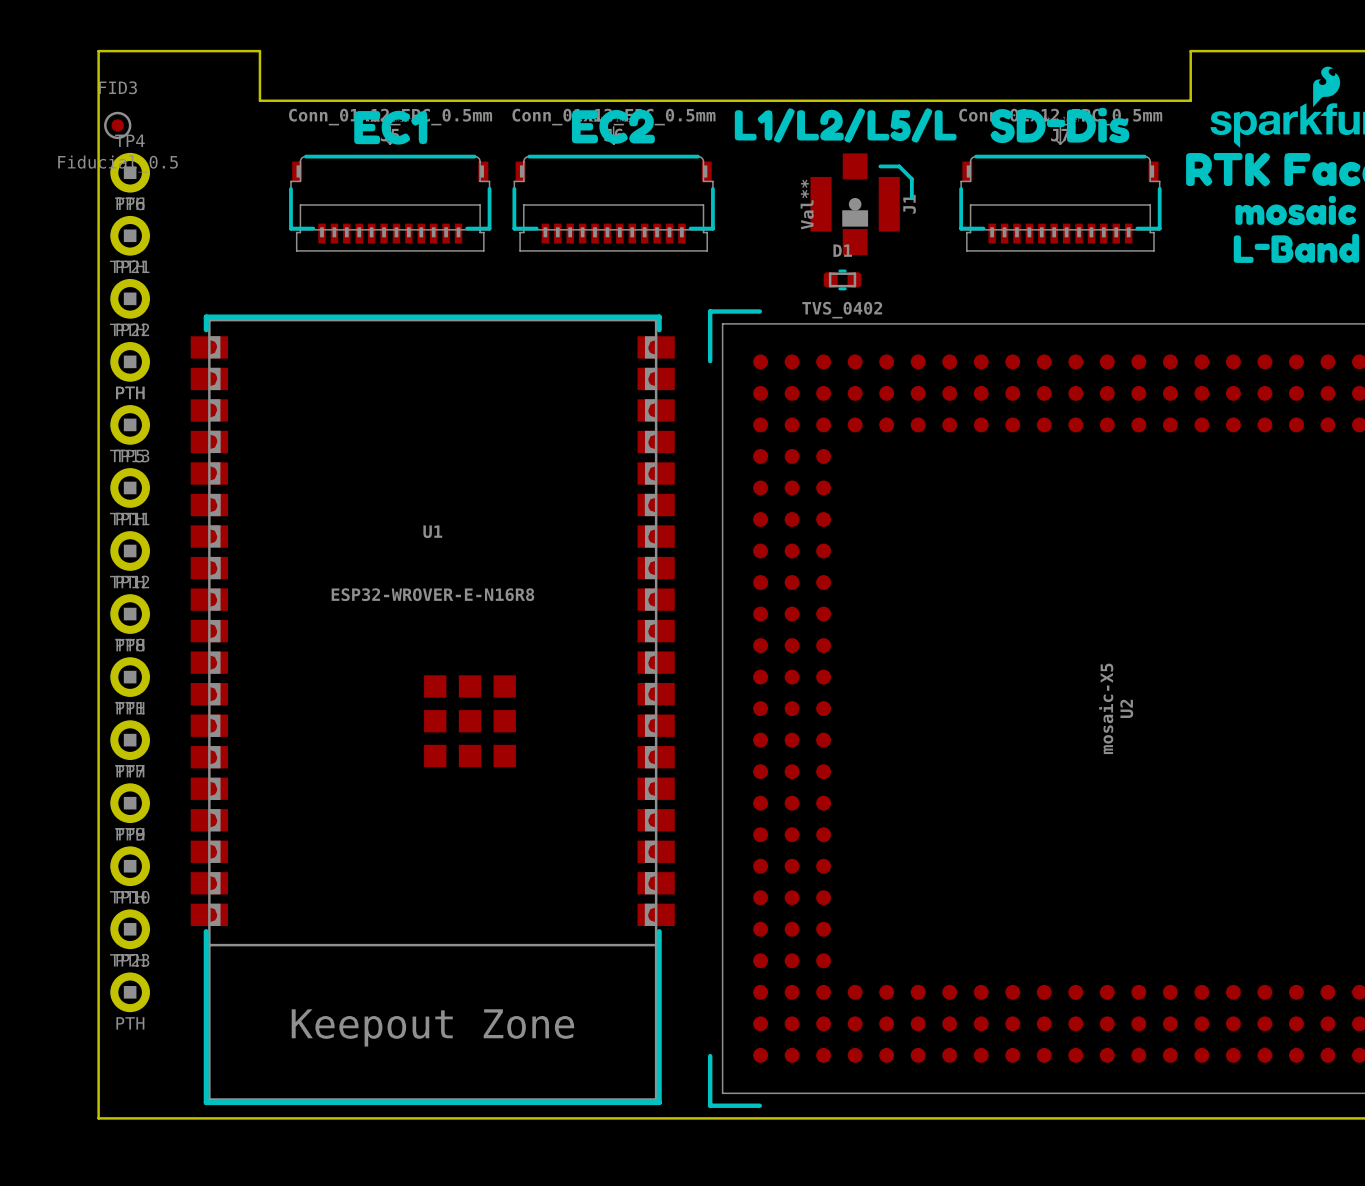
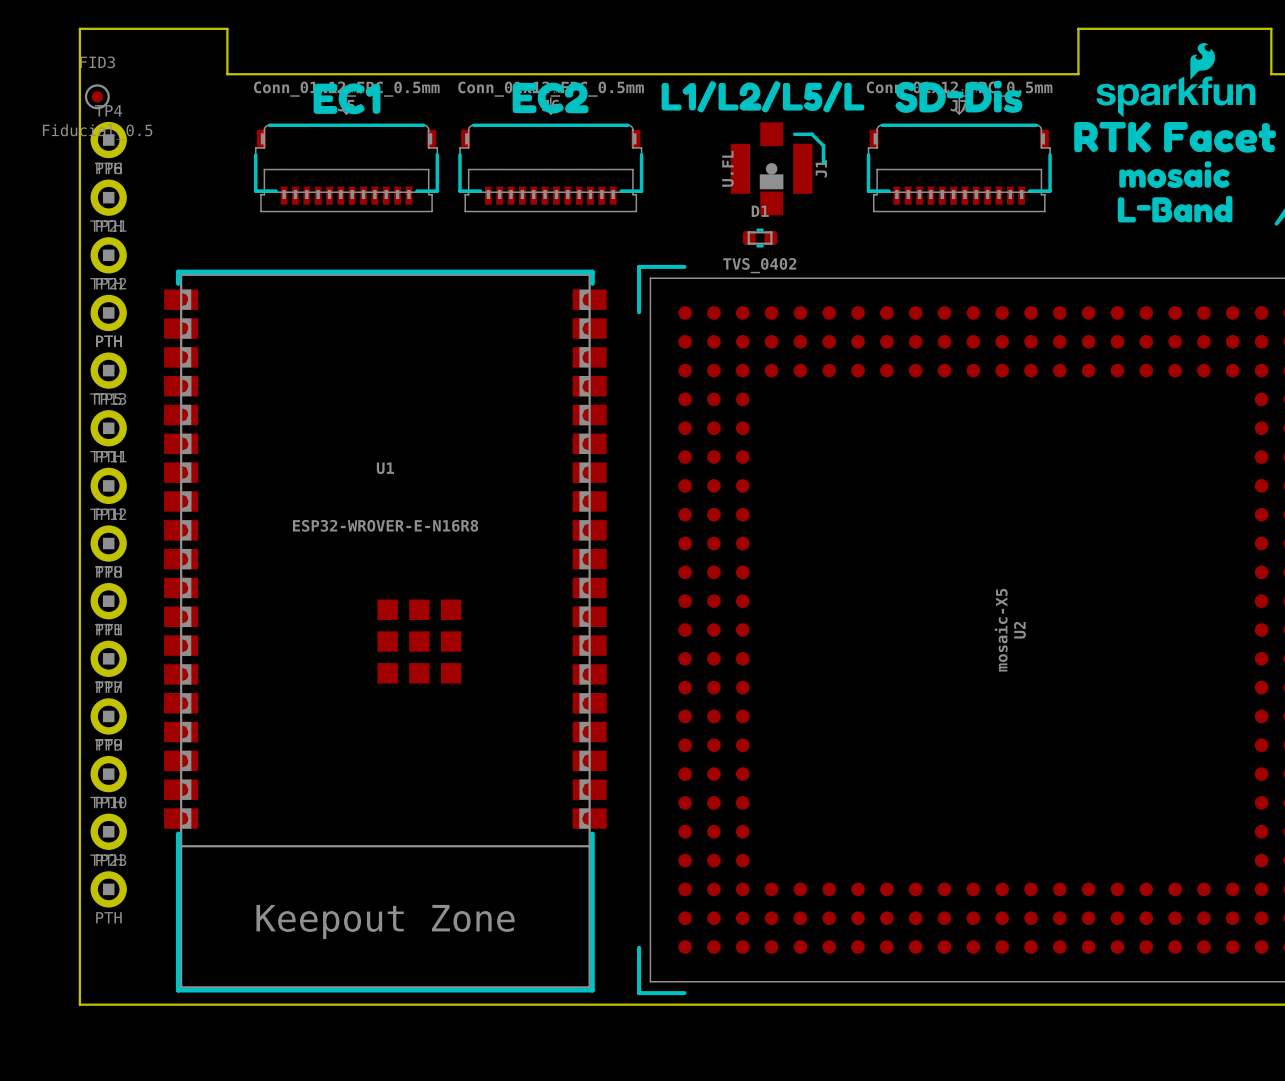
J1 value: Val** (807, 204) -> U.FL (728, 168)

